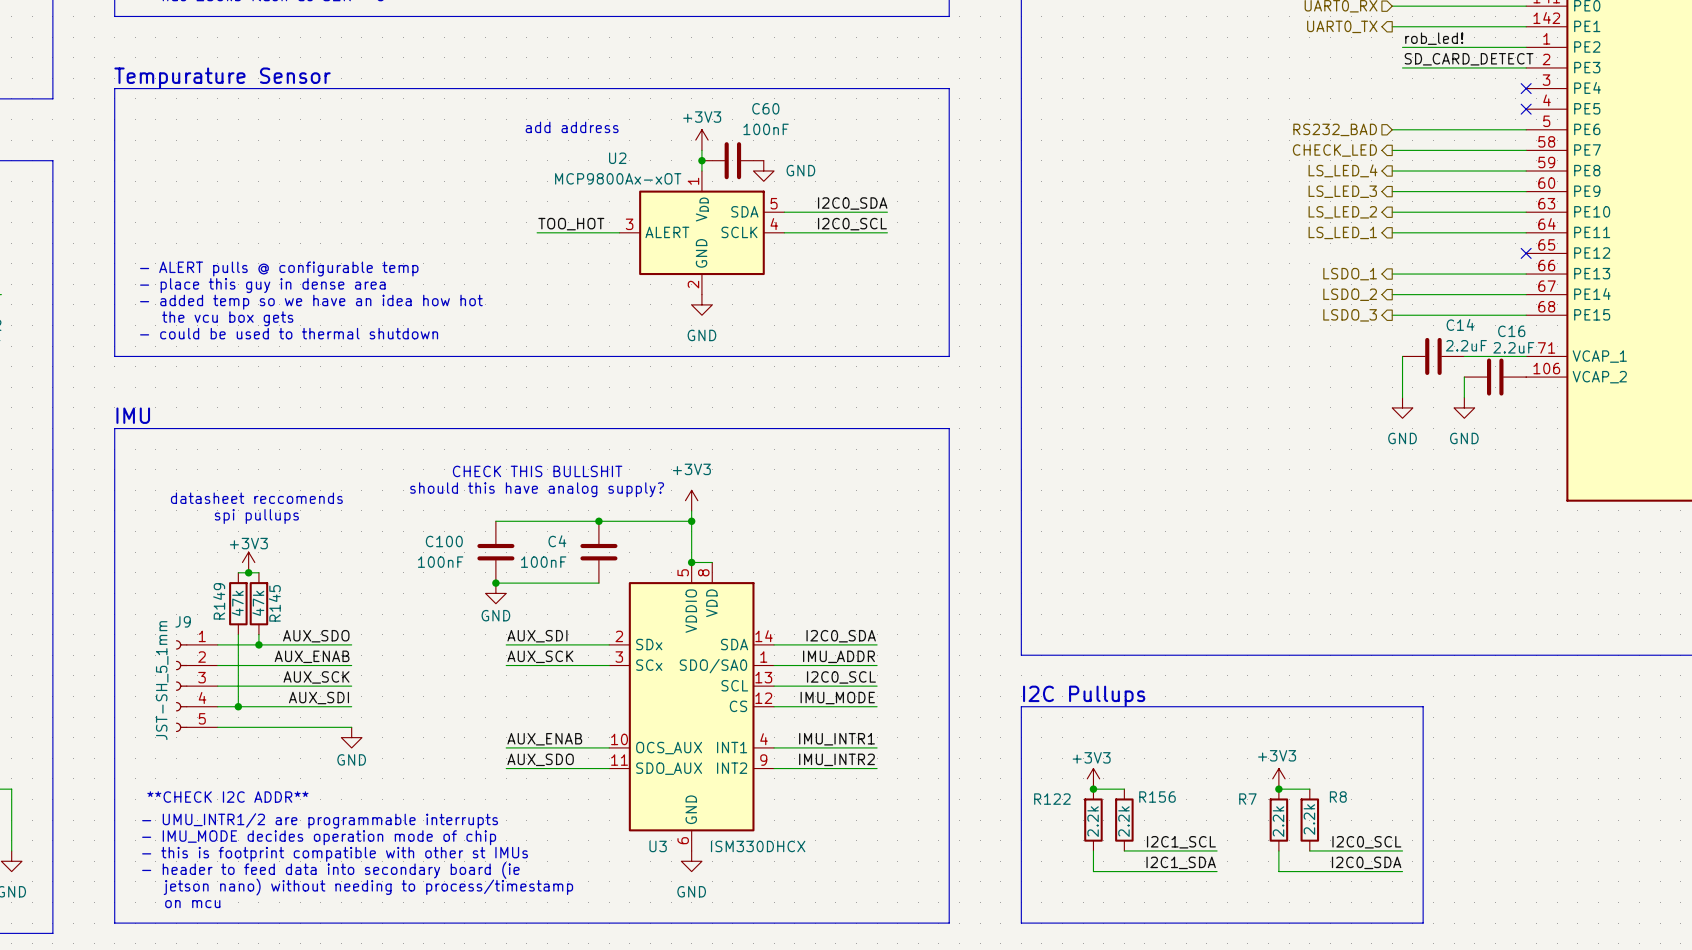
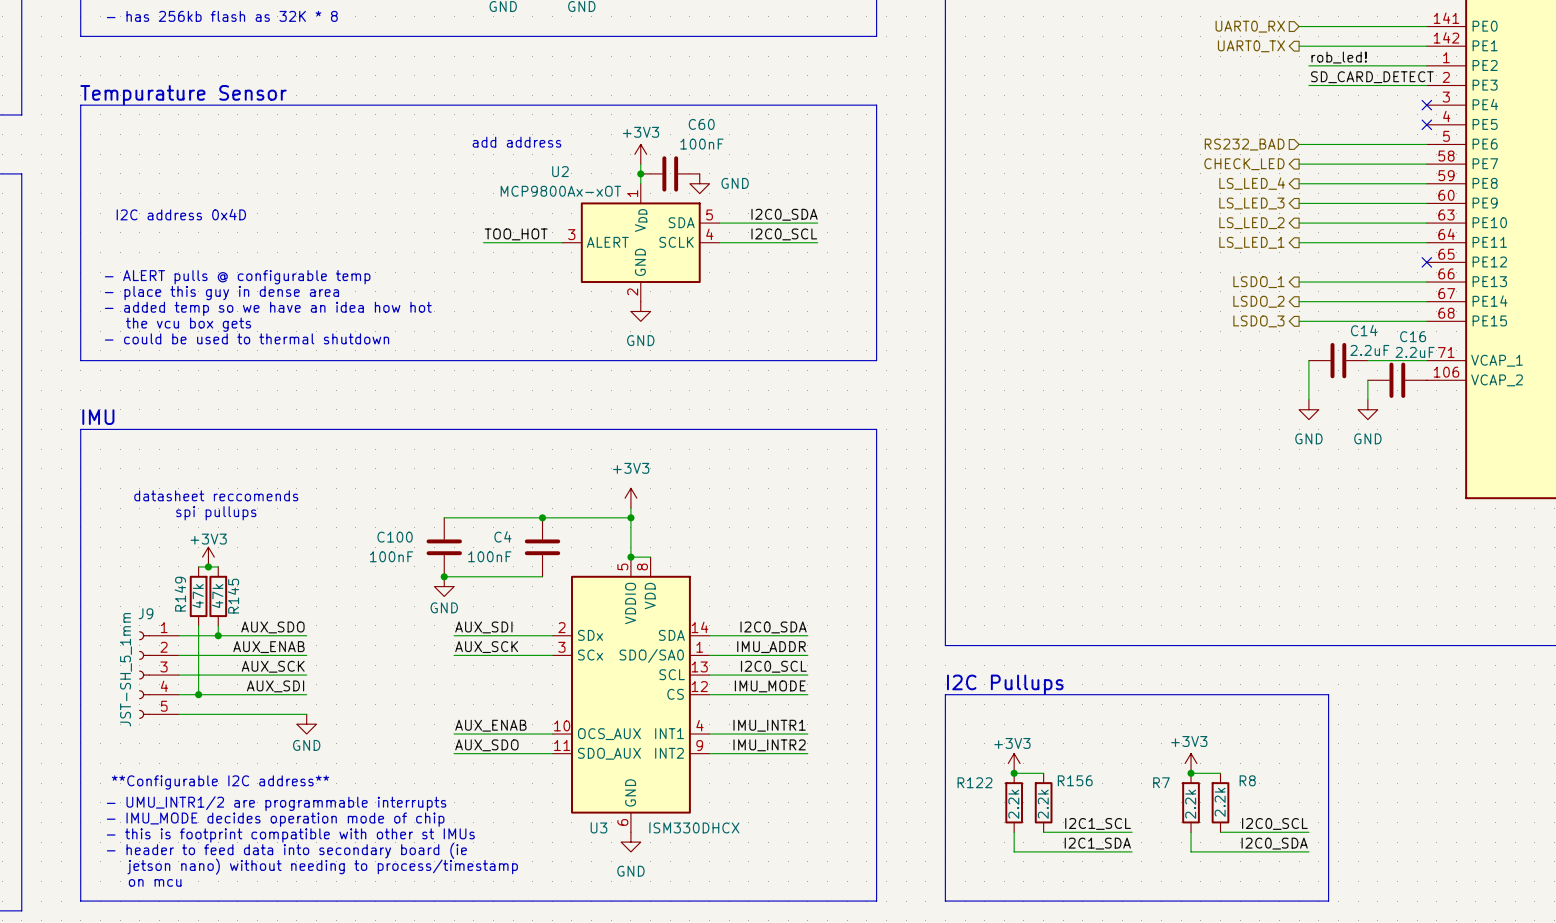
text: none -> I2C address 0x4D (181, 214)
text: CHECK THIS BULLSHIT (537, 471) -> none
text: should this have analog supply? (537, 489) -> none
text: **CHECK I2C ADDR** (227, 797) -> **Configurable I2C address** (220, 782)

